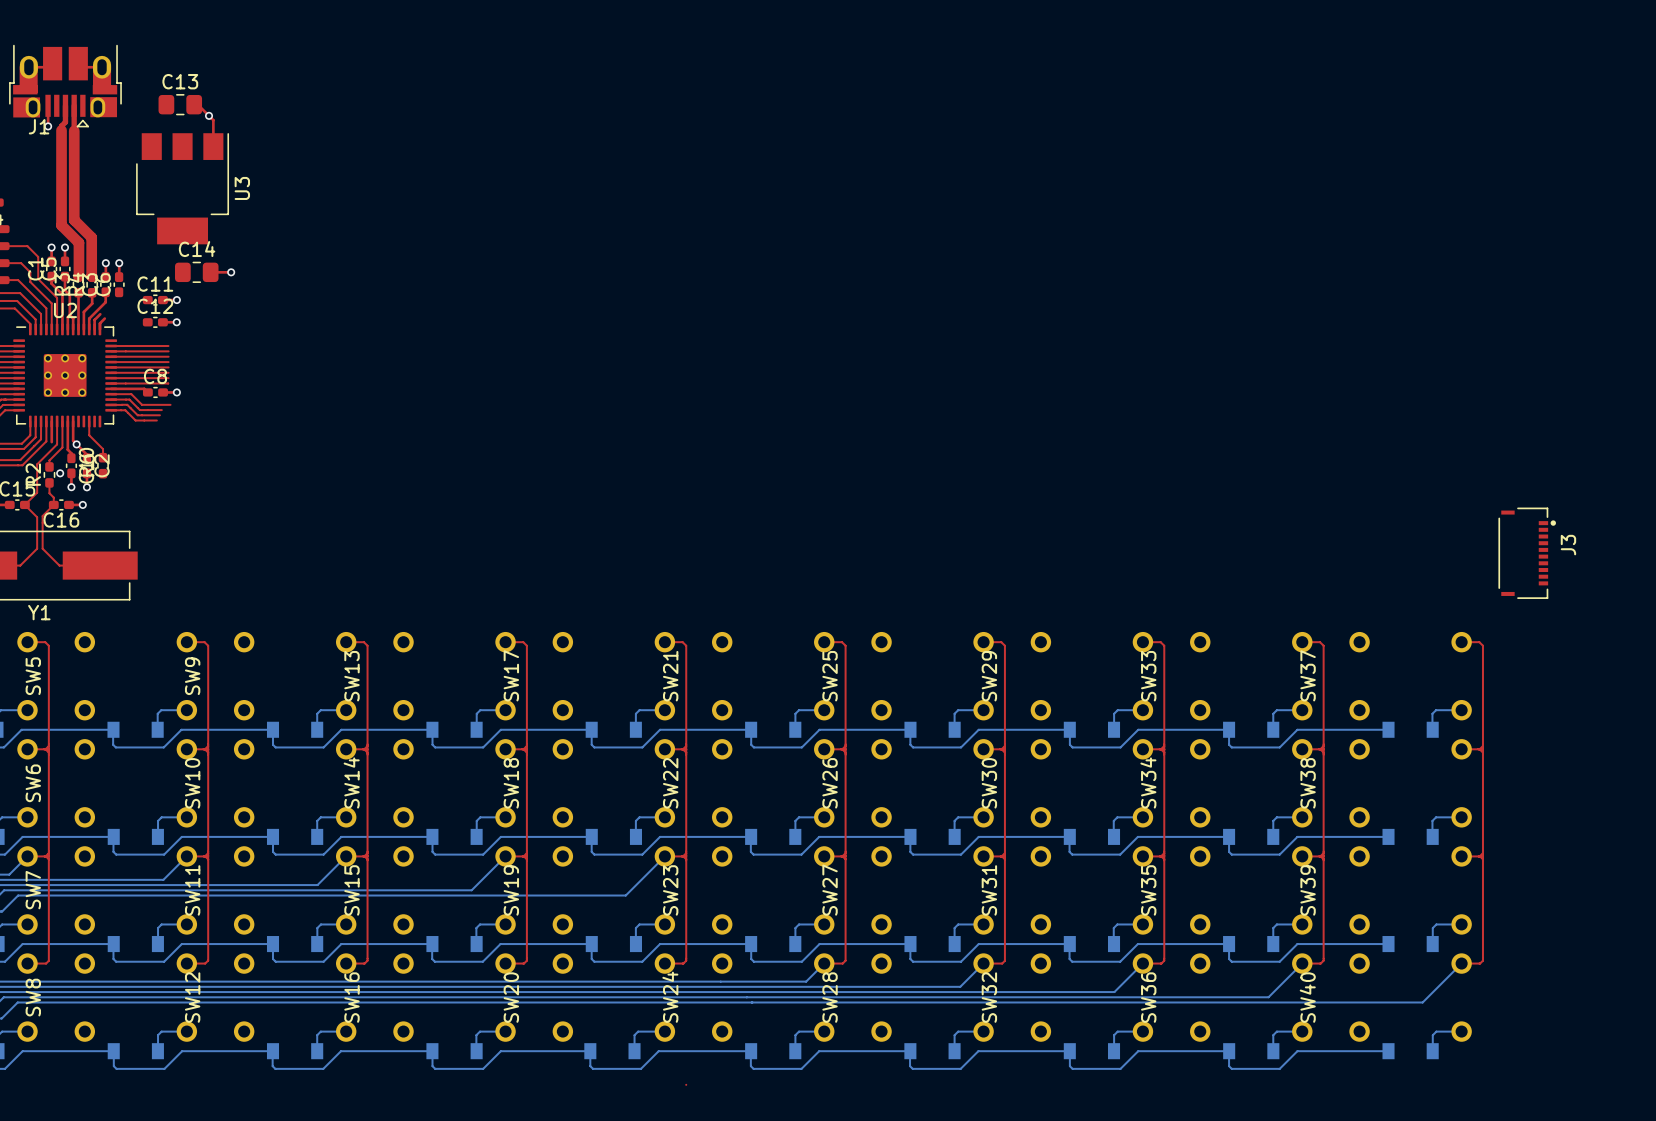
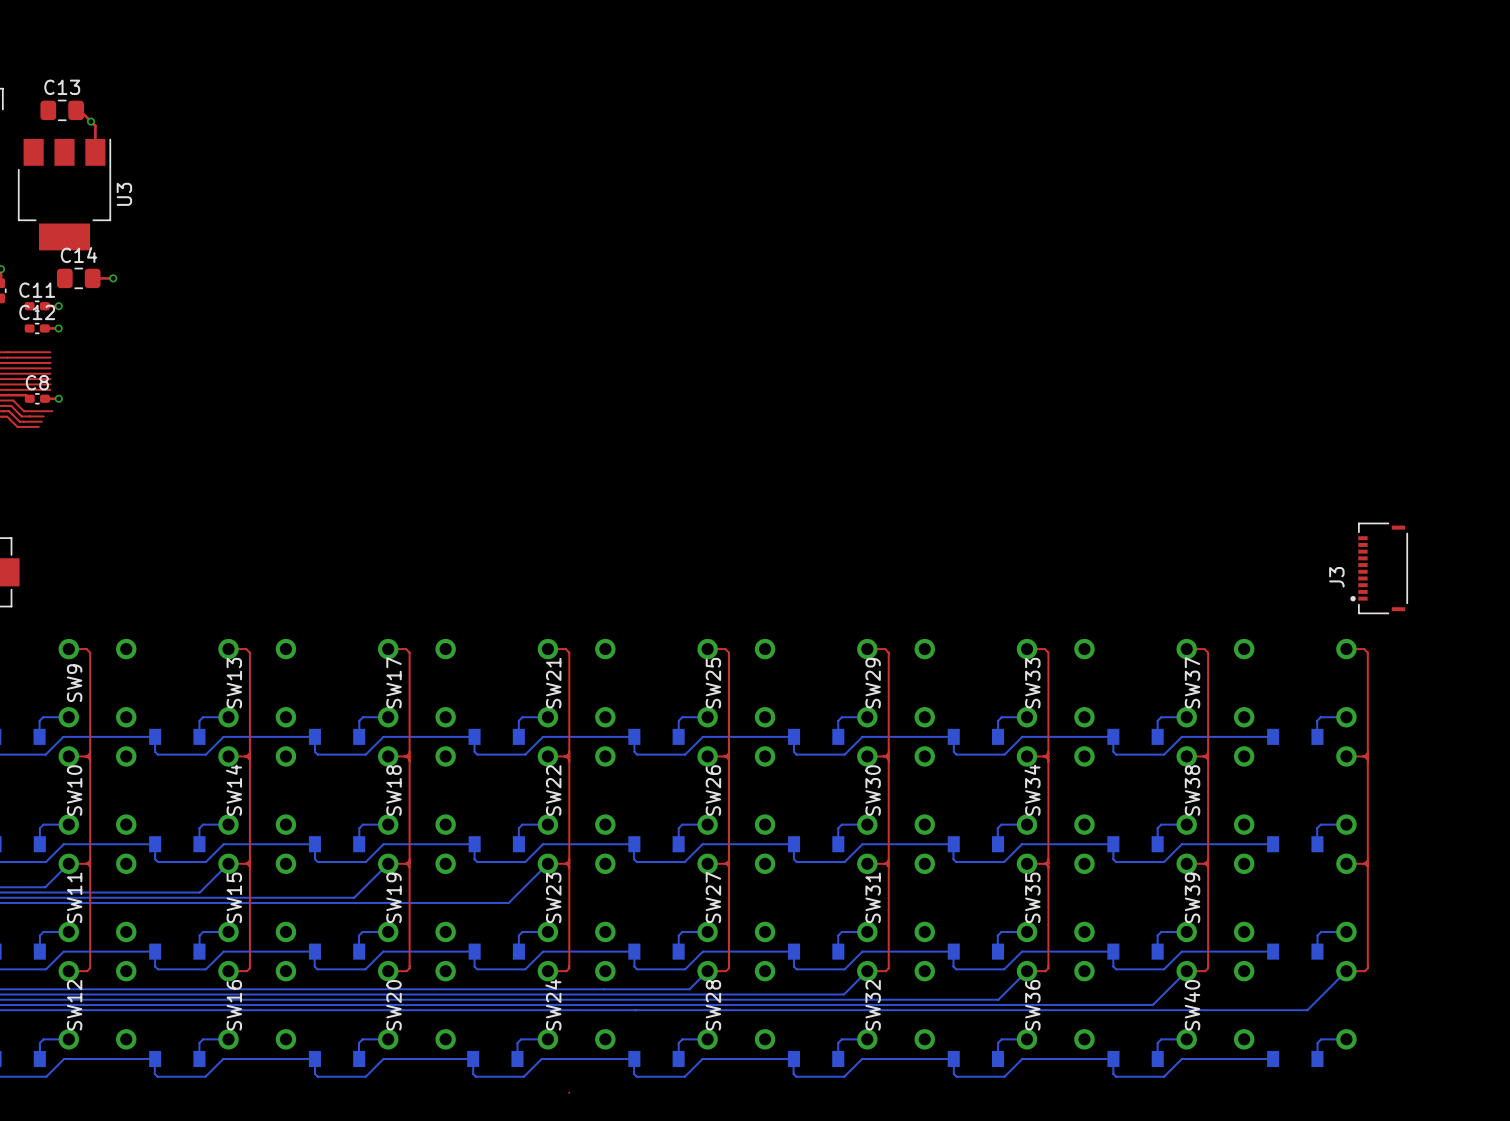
J3 rotation: 0° (1527, 553) -> 180° (1379, 568)

